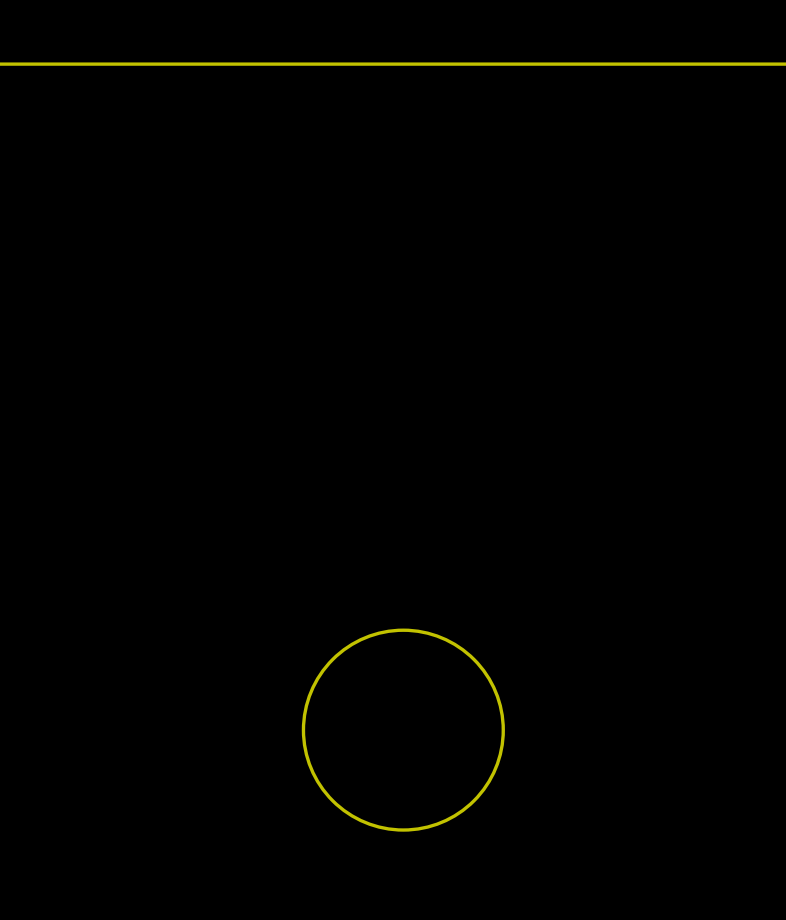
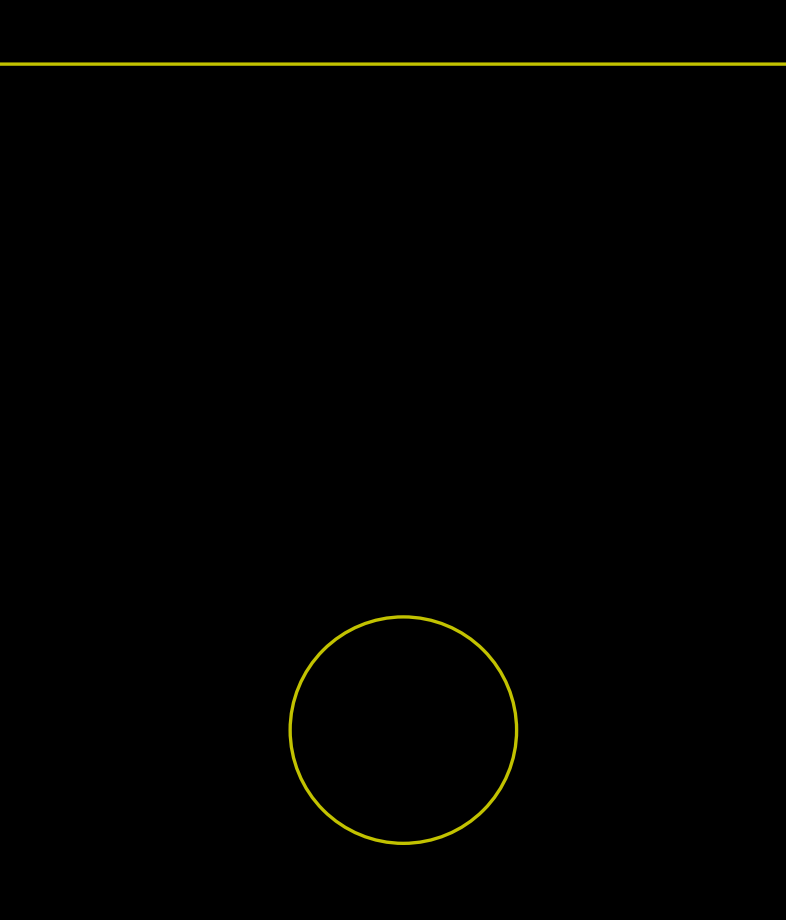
round board edge size: [301, 628, 505, 832] -> [288, 615, 519, 846]

